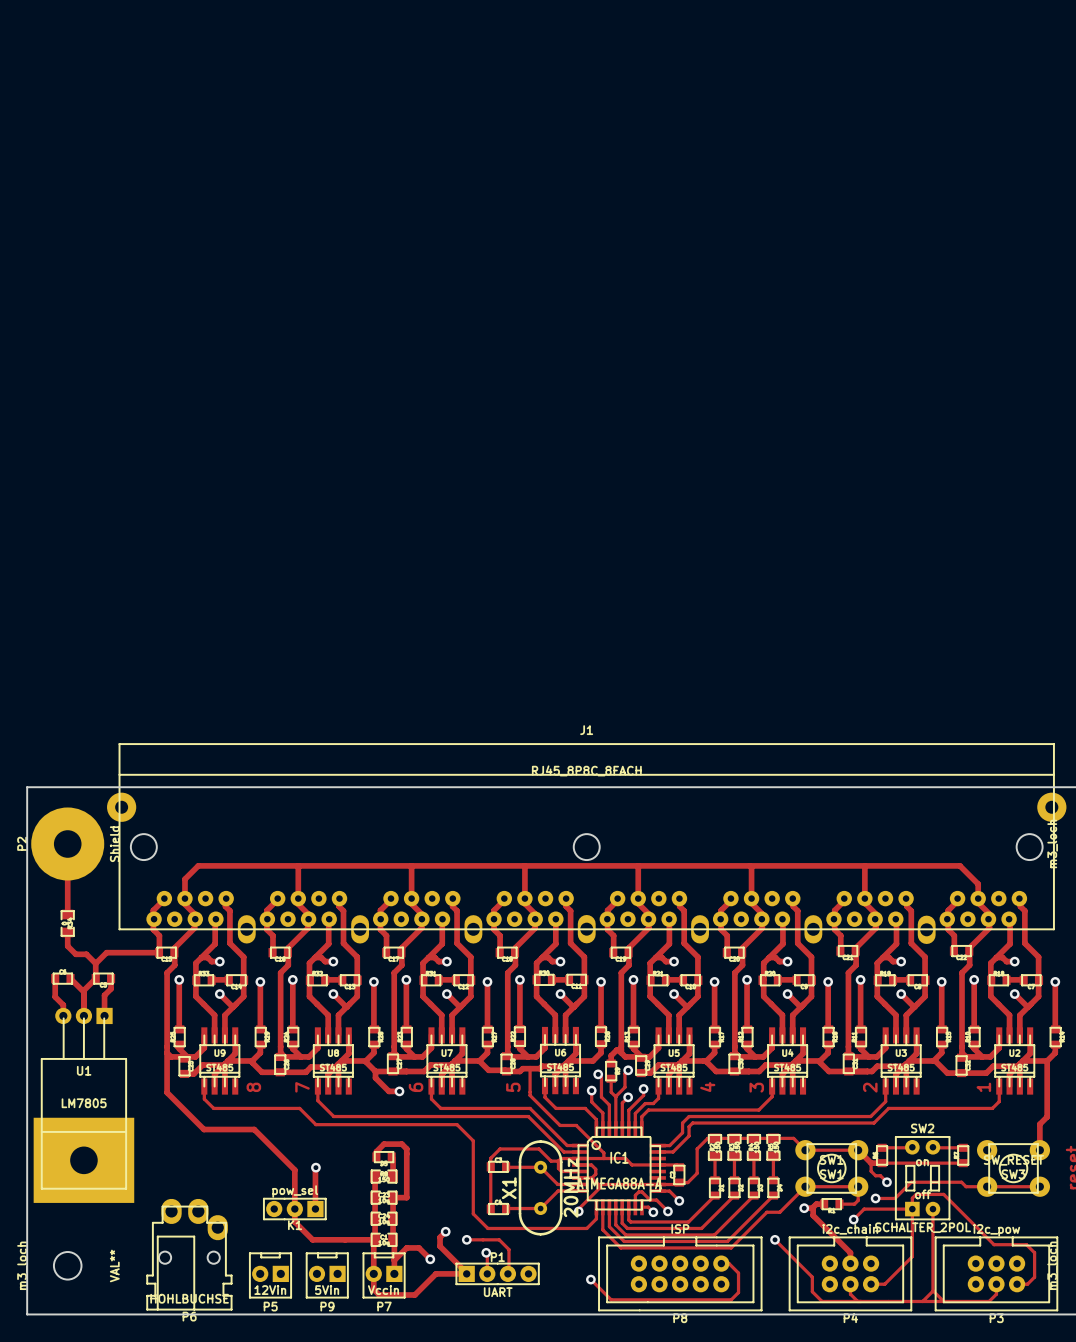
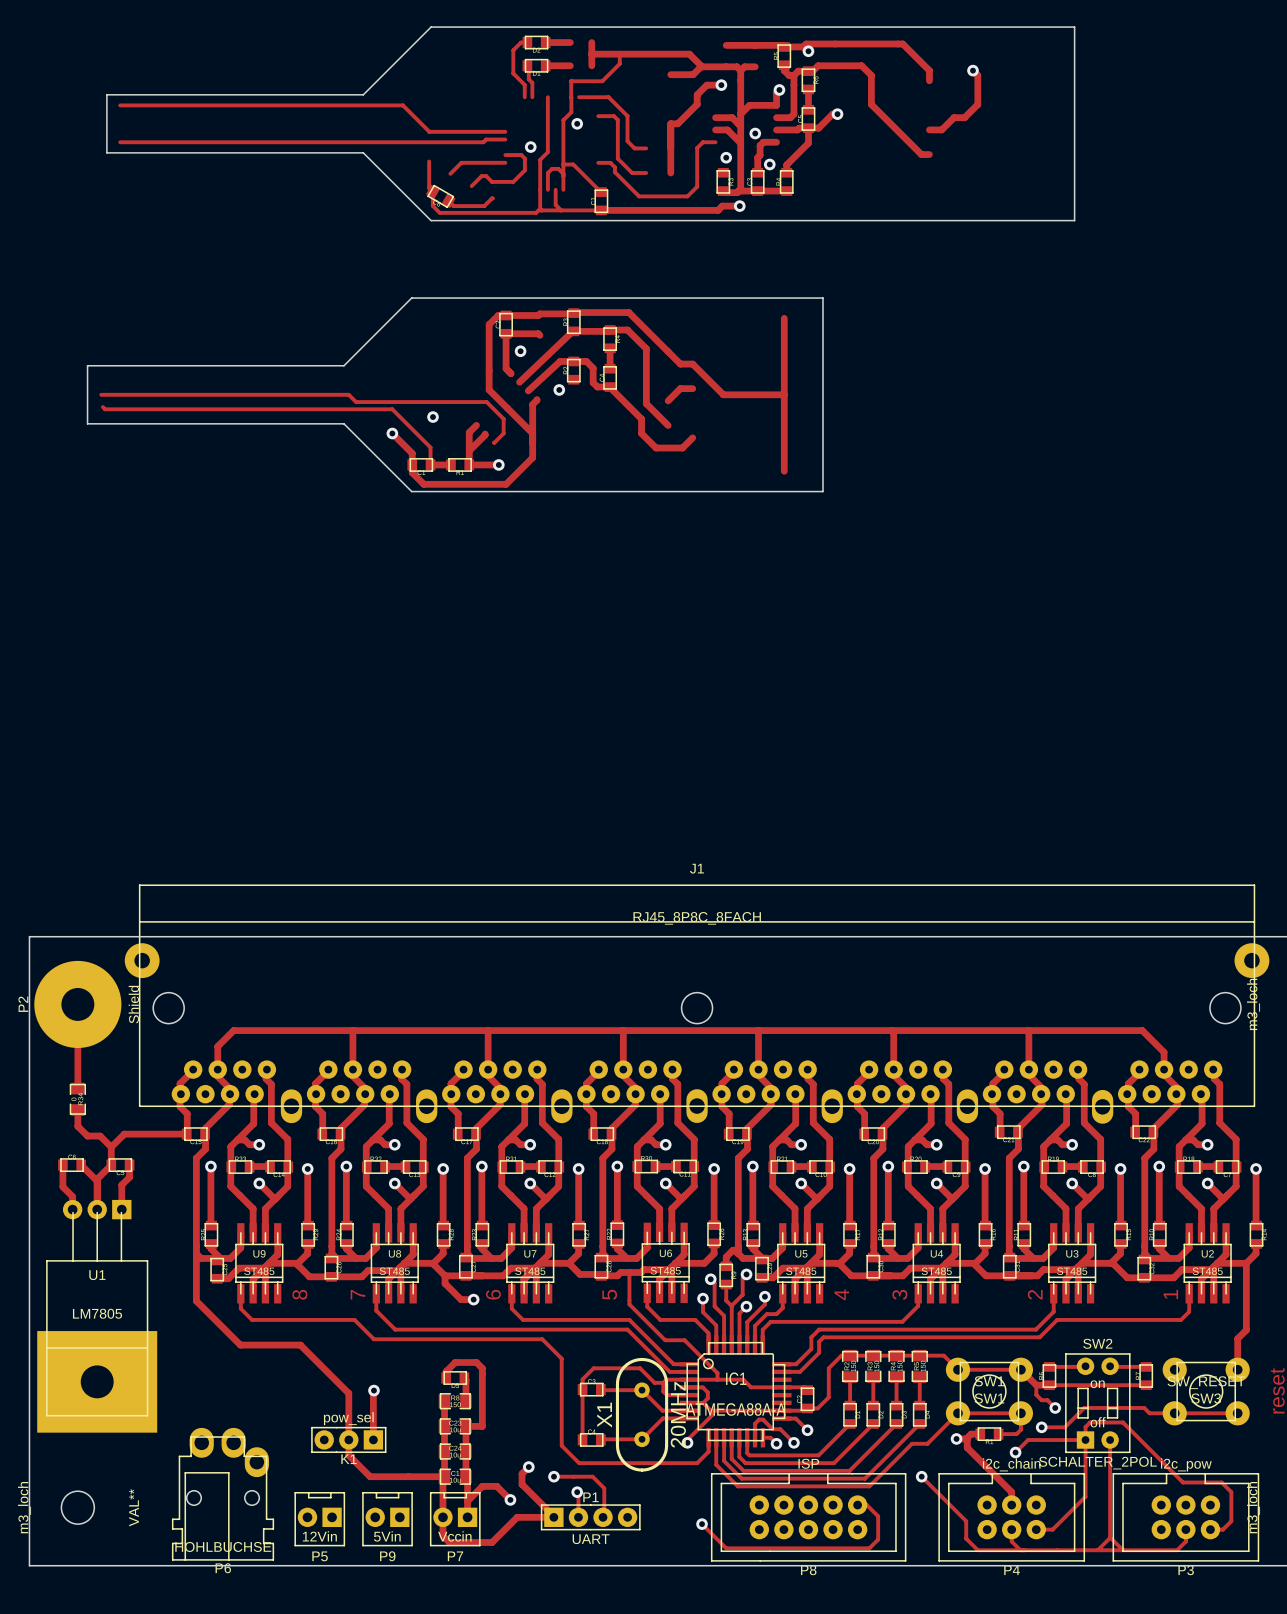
board edge: none -> (431, 27) (363, 94) (106, 94) (106, 152) (363, 152) (431, 220) (1074, 220) (1074, 27) (431, 27)
track: none -> (527, 42) (521, 42) (513, 50) (513, 73) (524, 84) (524, 97)
part: none -> (536, 42)
track: none -> (545, 42) (570, 42)
track: none -> (591, 42) (591, 65)
track: none -> (726, 45) (782, 45) (804, 46) (808, 51)
track: none -> (803, 46) (806, 44) (902, 44) (929, 70) (929, 80)
via: none -> (808, 51)
track: none -> (591, 54) (689, 54) (702, 66)
track: none -> (619, 54) (619, 63) (602, 81) (571, 81) (571, 112) (563, 120) (563, 189)
part: none -> (784, 56)
track: none -> (784, 65) (784, 70) (789, 75) (793, 75)
track: none -> (527, 65) (528, 79) (532, 82) (532, 97)
part: none -> (536, 65)
track: none -> (545, 65) (570, 65)
track: none -> (755, 66) (744, 66) (740, 70)
track: none -> (740, 70) (740, 189) (737, 192) (723, 192)
track: none -> (740, 70) (736, 66) (700, 66) (693, 74) (670, 74)
track: none -> (972, 70) (977, 75) (977, 104) (964, 117) (954, 117) (941, 129) (929, 129)
via: none -> (972, 70)
track: none -> (793, 75) (798, 71) (812, 71) (818, 65) (861, 65) (871, 75) (871, 104) (921, 154) (929, 154)
track: none -> (793, 75) (793, 114) (790, 117) (776, 117)
part: none -> (808, 80)
track: none -> (721, 85) (706, 85) (697, 94) (697, 104) (677, 123) (670, 123) (670, 173)
via: none -> (721, 85)
track: none -> (779, 89) (776, 92) (776, 105) (749, 105) (740, 114)
via: none -> (779, 89)
track: none -> (808, 89) (808, 109)
track: none -> (547, 97) (547, 152) (540, 159) (540, 208) (541, 210)
track: none -> (579, 97) (608, 97) (627, 116) (627, 141) (634, 148) (646, 148)
track: none -> (120, 105) (402, 105) (429, 131) (505, 131)
track: none -> (837, 114) (832, 114) (818, 128) (776, 129)
via: none -> (837, 114)
track: none -> (598, 116) (614, 116) (617, 119) (617, 158) (632, 173) (646, 173)
track: none -> (715, 117) (732, 117) (740, 126)
part: none -> (808, 119)
via: none -> (577, 123)
track: none -> (808, 128) (808, 143) (786, 164) (786, 172)
track: none -> (715, 129) (727, 129) (740, 143)
via: none -> (755, 133)
track: none -> (505, 139) (486, 139) (483, 142) (120, 142)
track: none -> (715, 142) (702, 142) (697, 148) (697, 186) (687, 196) (639, 196) (614, 172) (614, 167) (610, 162) (598, 162)
track: none -> (776, 142) (763, 142) (760, 145) (757, 172)
via: none -> (530, 147)
track: none -> (505, 155) (521, 155) (524, 158) (524, 170) (513, 181) (492, 181) (486, 176) (481, 176) (471, 186)
via: none -> (726, 157)
track: none -> (429, 161) (429, 188) (432, 191) (432, 205) (439, 212) (536, 212) (538, 210) (718, 210) (722, 206) (739, 206)
track: none -> (505, 162) (461, 162) (450, 173)
track: none -> (563, 164) (573, 164) (601, 192)
via: none -> (769, 164)
track: none -> (563, 173) (558, 168) (552, 168) (547, 172) (547, 189)
part: none -> (723, 181)
part: none -> (757, 181)
part: none -> (786, 181)
track: none -> (555, 189) (555, 204) (561, 210)
track: none -> (738, 191) (786, 191)
part: none -> (440, 196)
track: none -> (493, 198) (484, 206) (453, 206) (448, 200)
part: none -> (601, 201)
via: none -> (739, 206)
board edge: none -> (411, 298) (343, 365) (87, 365) (87, 423) (343, 423) (411, 491) (822, 491) (822, 298) (411, 298)
track: none -> (784, 318) (784, 471)
part: none -> (573, 322)
part: none -> (506, 324)
track: none -> (539, 335) (538, 333) (506, 333) (506, 368) (510, 373)
part: none -> (610, 339)
track: none -> (610, 348) (610, 368)
via: none -> (520, 351)
part: none -> (573, 370)
part: none -> (610, 377)
track: none -> (519, 382) (572, 331) (627, 330) (646, 348) (646, 403) (668, 425)
track: none -> (692, 388) (680, 388) (668, 400)
via: none -> (559, 389)
track: none -> (528, 390) (560, 361) (586, 361) (593, 368) (593, 382) (597, 387) (610, 387) (641, 418) (641, 433) (656, 448) (682, 448) (692, 437)
track: none -> (101, 394) (348, 394) (356, 402) (486, 402) (503, 418) (503, 433) (493, 442)
track: none -> (784, 394) (723, 394) (692, 364) (680, 364) (628, 312) (498, 315) (489, 324) (489, 389) (532, 433)
track: none -> (536, 399) (532, 404) (532, 457) (506, 484) (423, 484) (412, 472) (412, 453) (392, 433)
track: none -> (102, 407) (105, 409) (392, 409) (430, 447) (430, 464) (450, 464)
via: none -> (433, 417)
track: none -> (476, 425) (469, 432) (469, 464) (498, 464)
via: none -> (392, 433)
track: none -> (485, 434) (469, 450)
part: none -> (421, 464)
part: none -> (460, 464)
via: none -> (498, 464)

